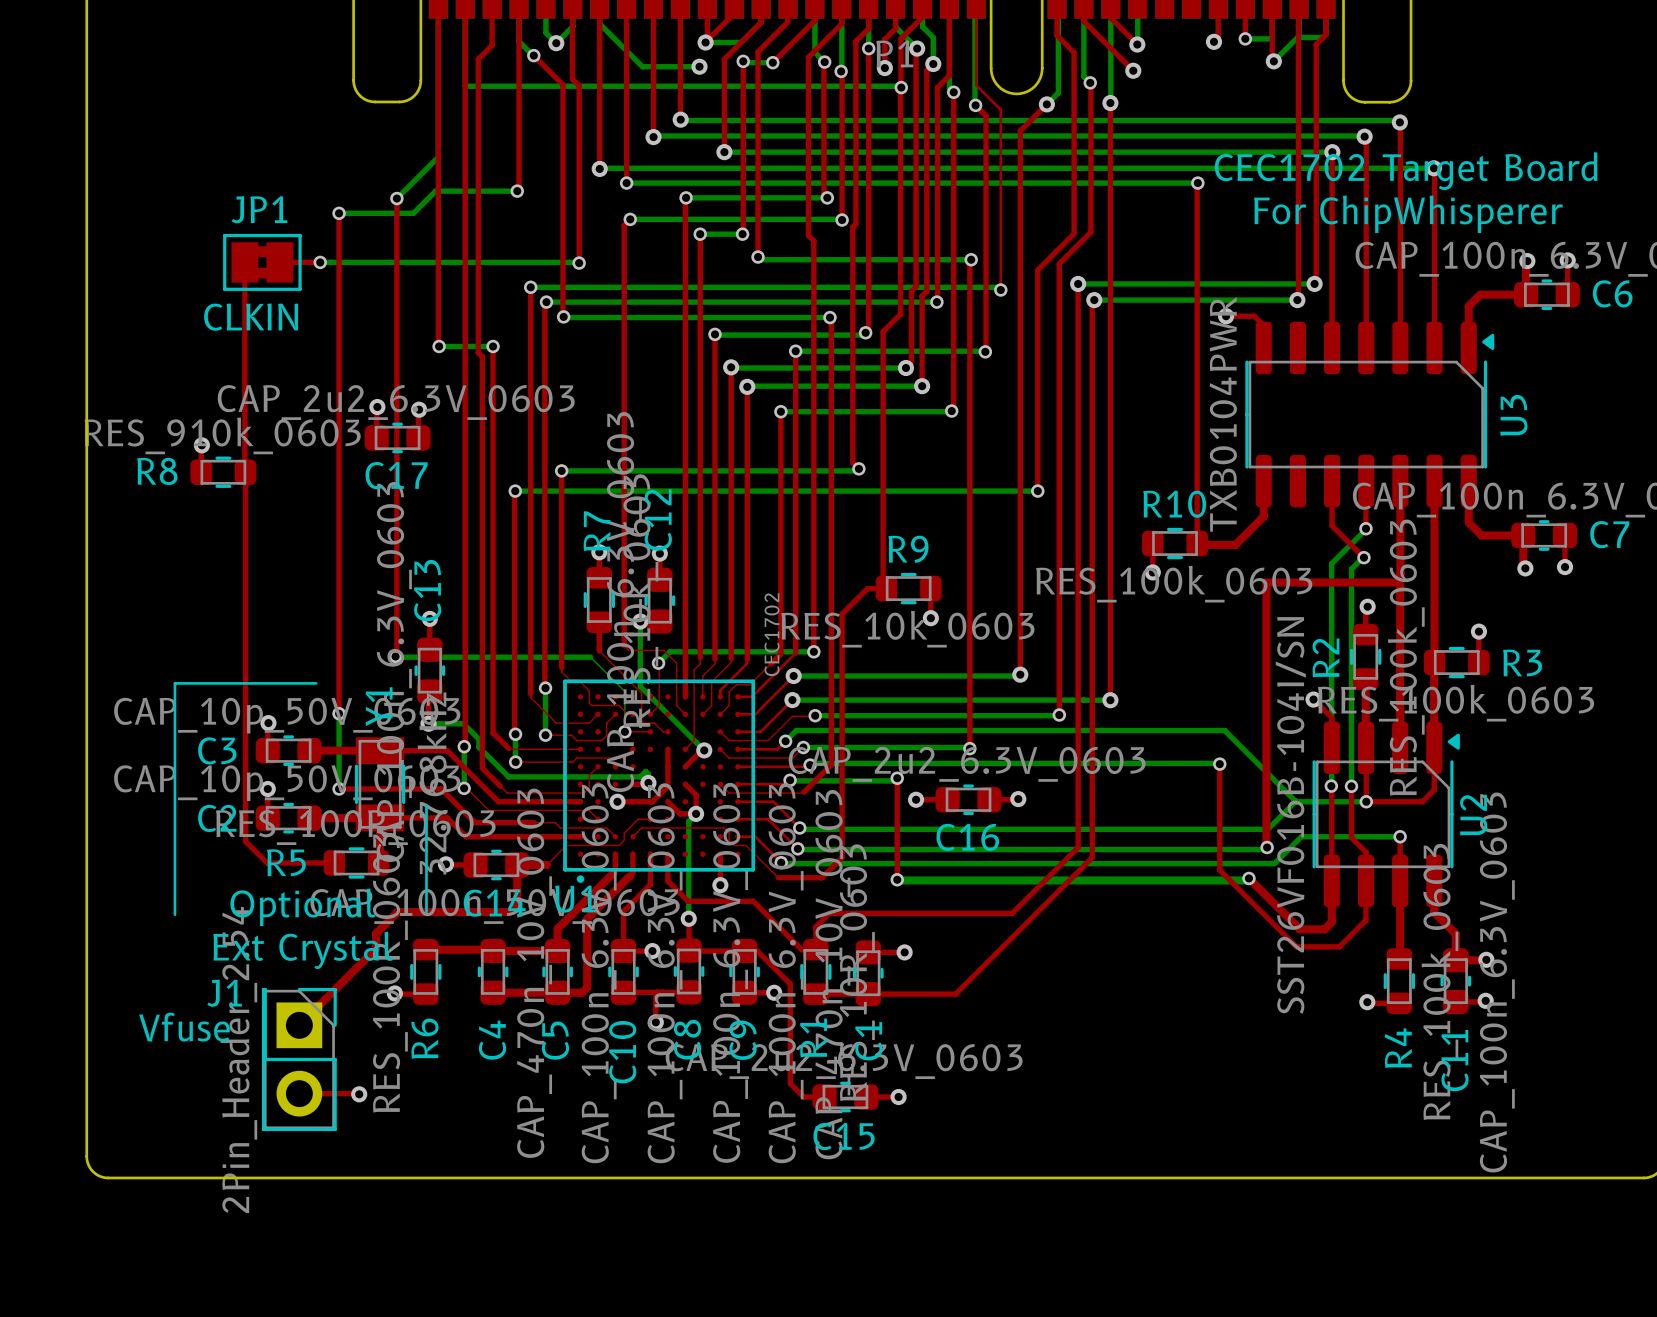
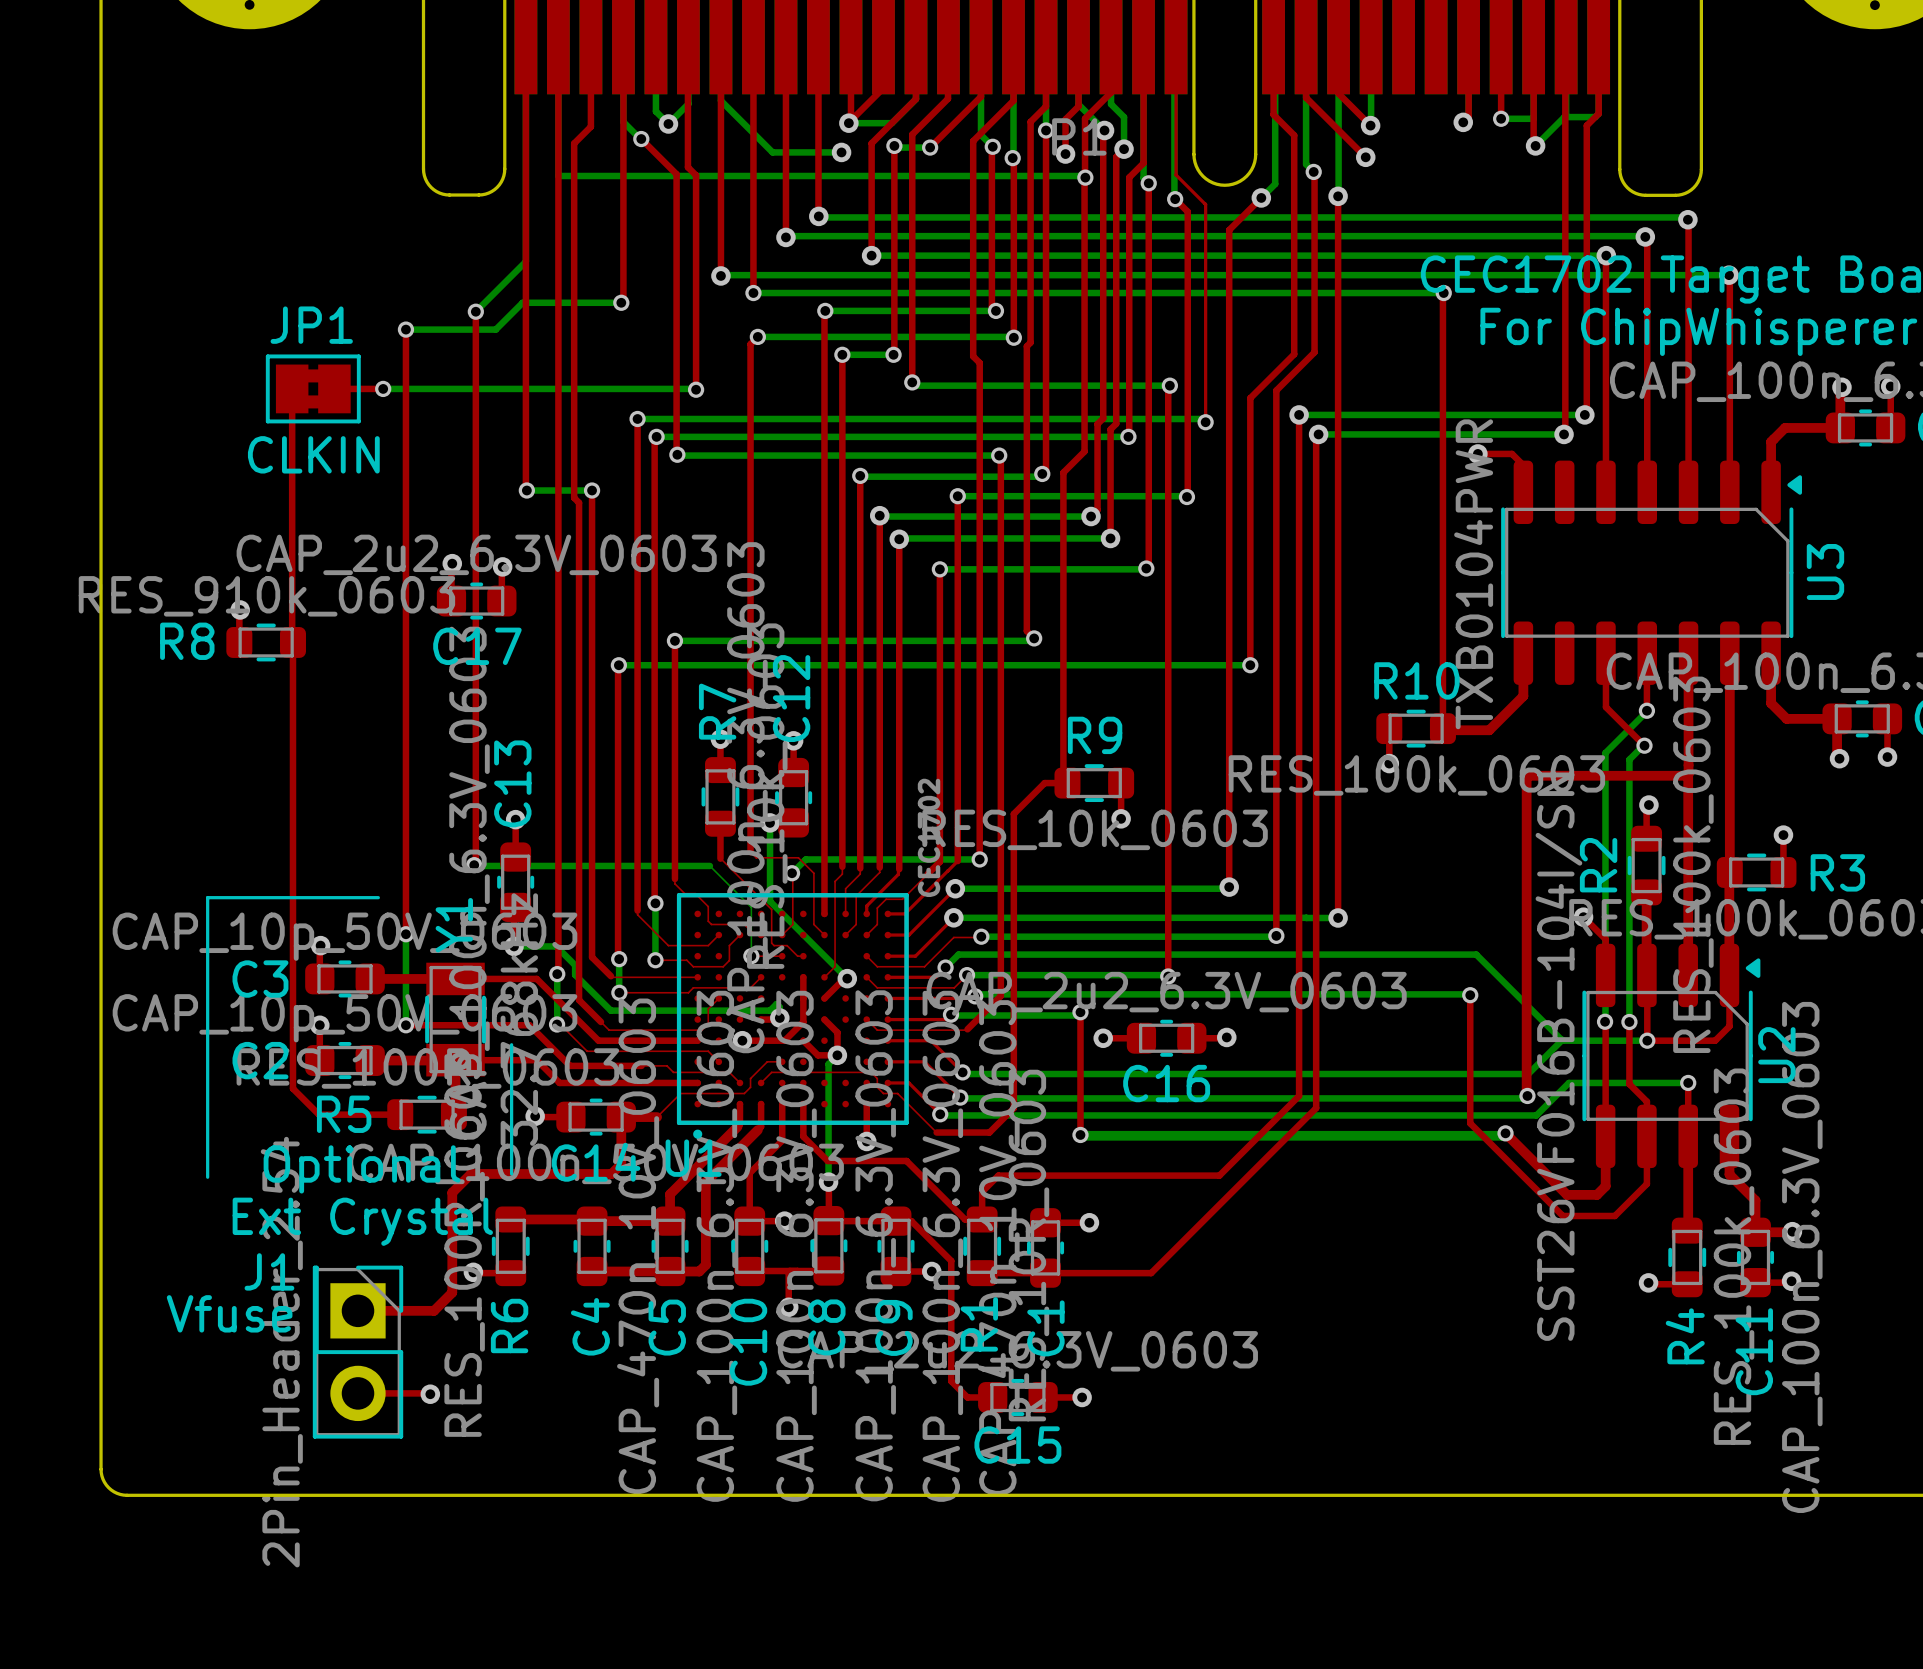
top track: (397, 912) (376, 933) (376, 948) (299, 1025) -> (476, 1173) (470, 1173) (452, 1192) (452, 1292) (434, 1310) (358, 1310)

